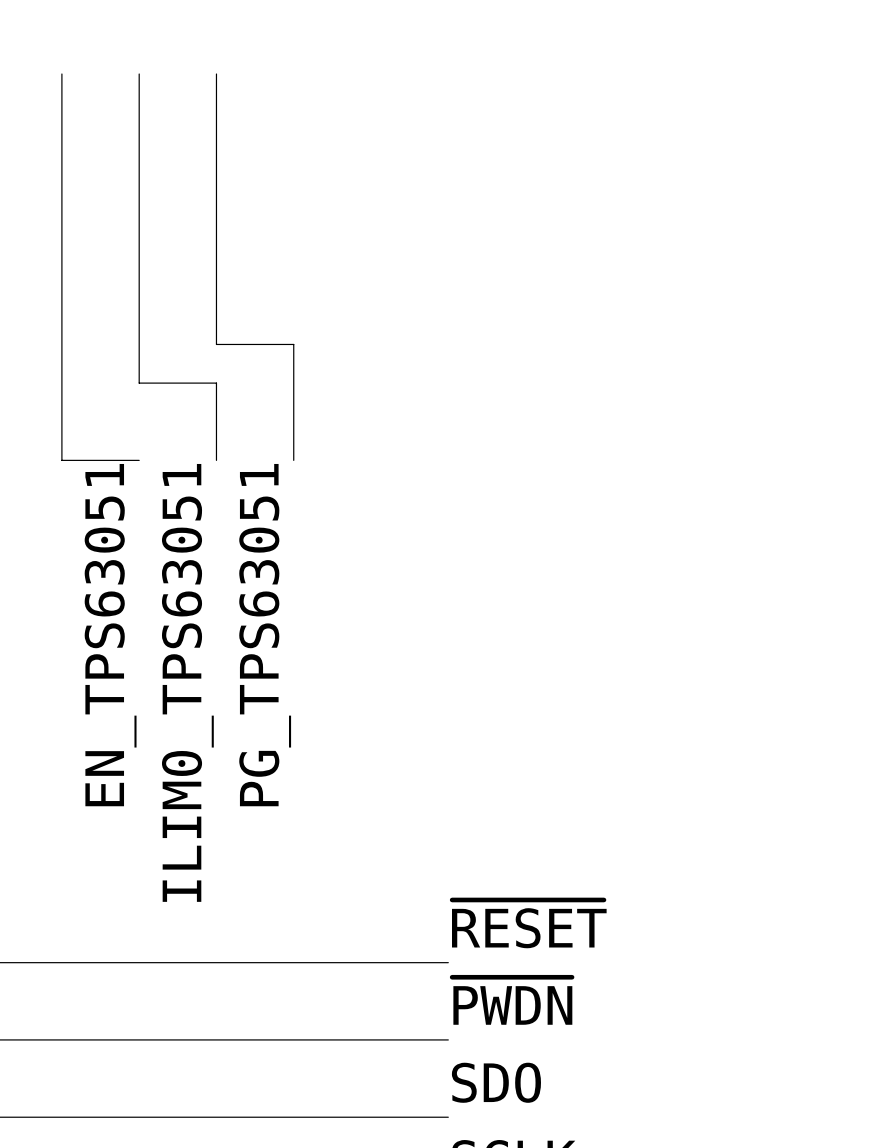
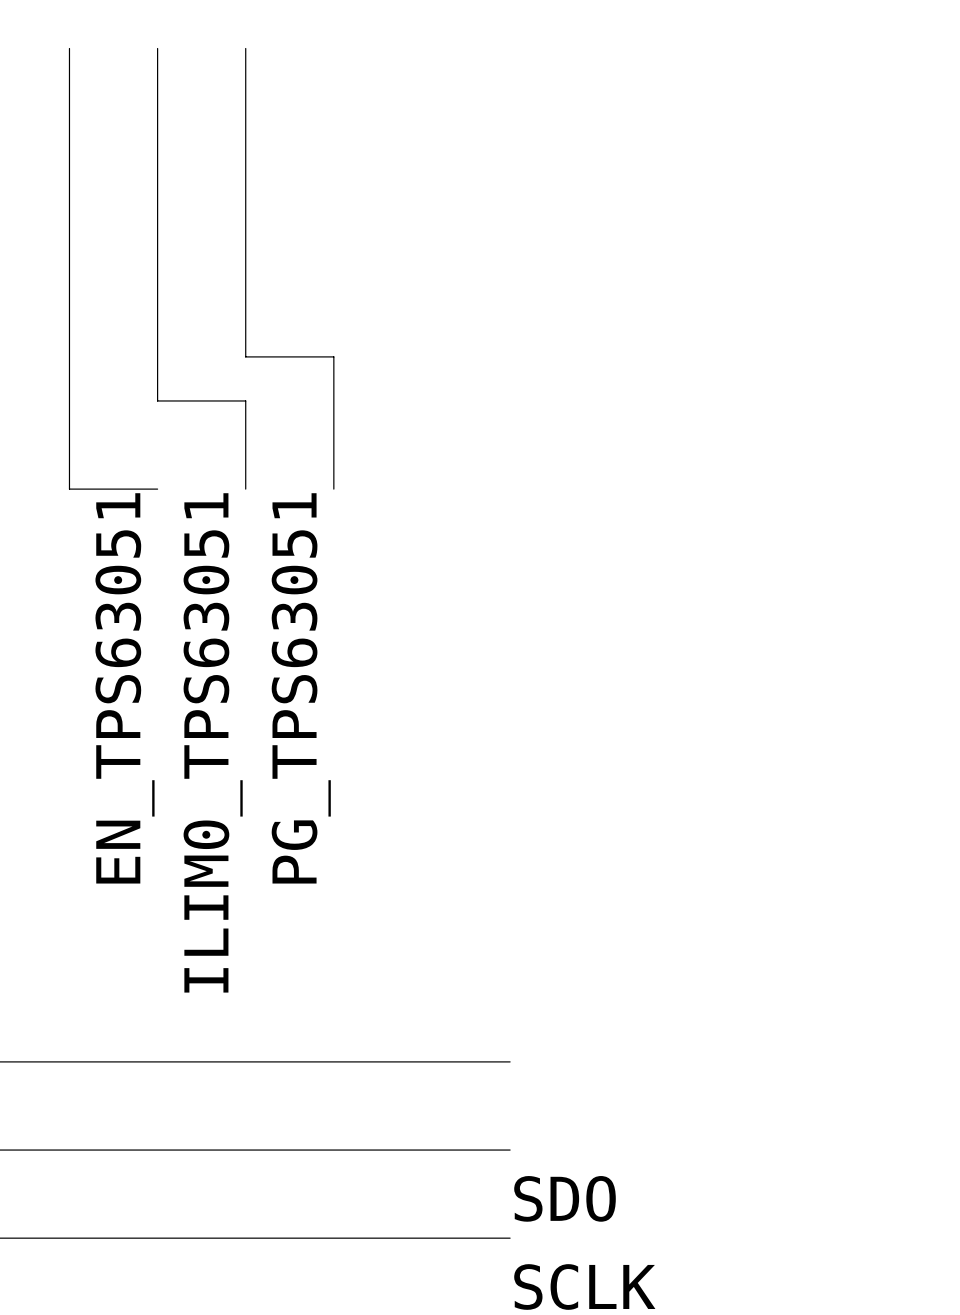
label: ~{RESET} (529, 924) -> none
label: ~{PWDN} (512, 1001) -> none

